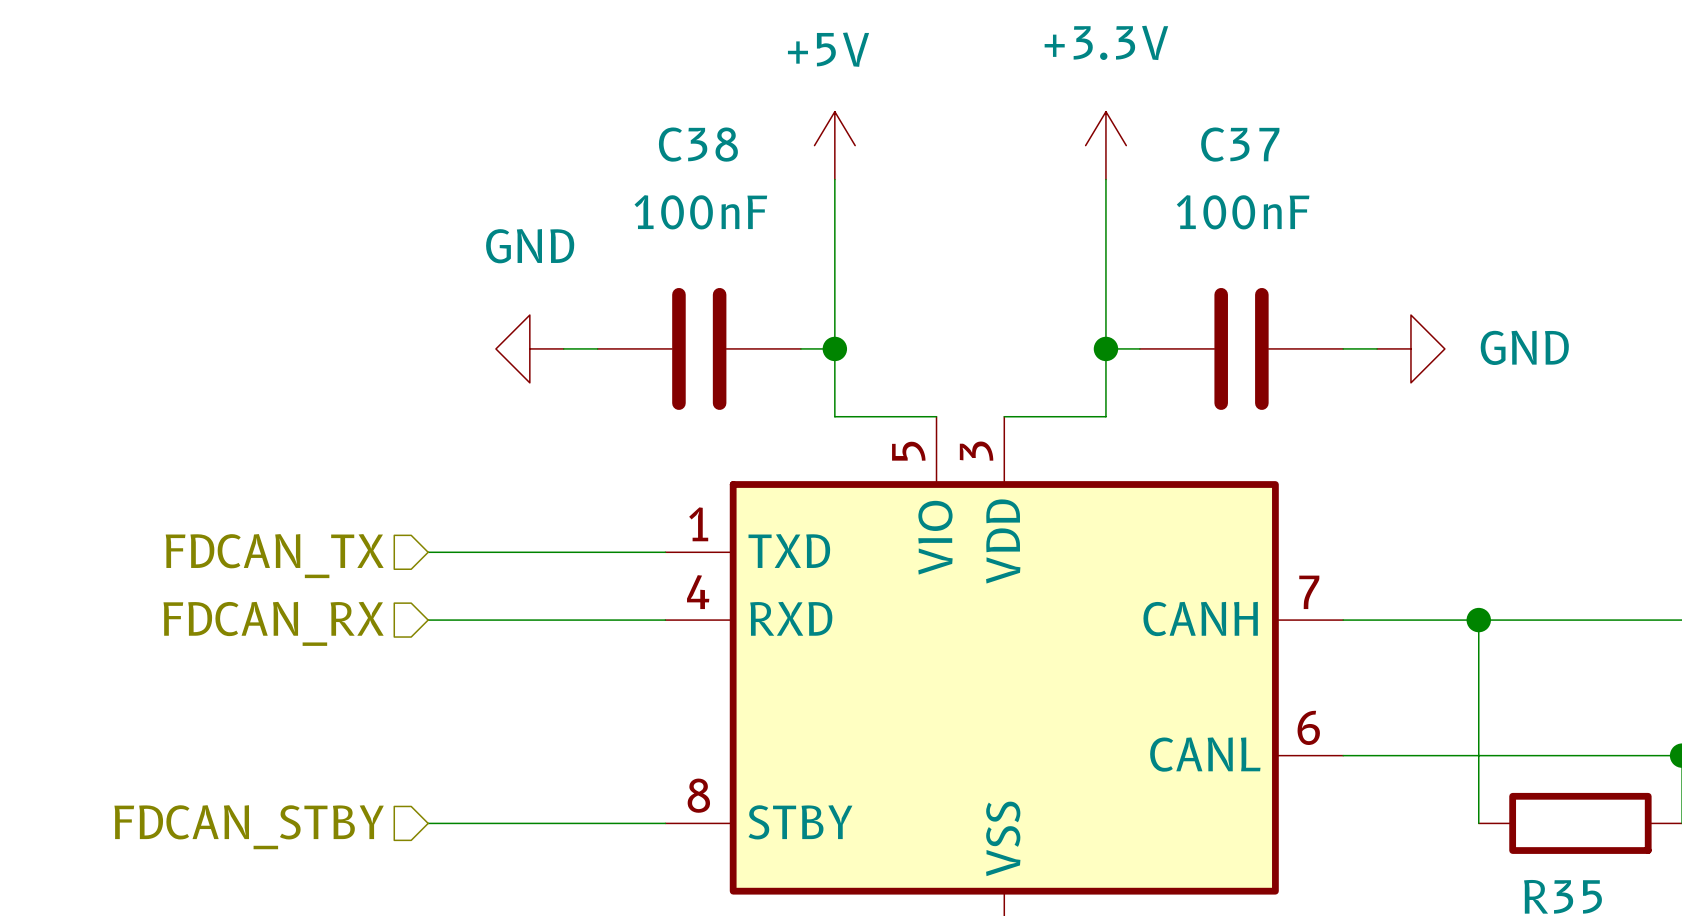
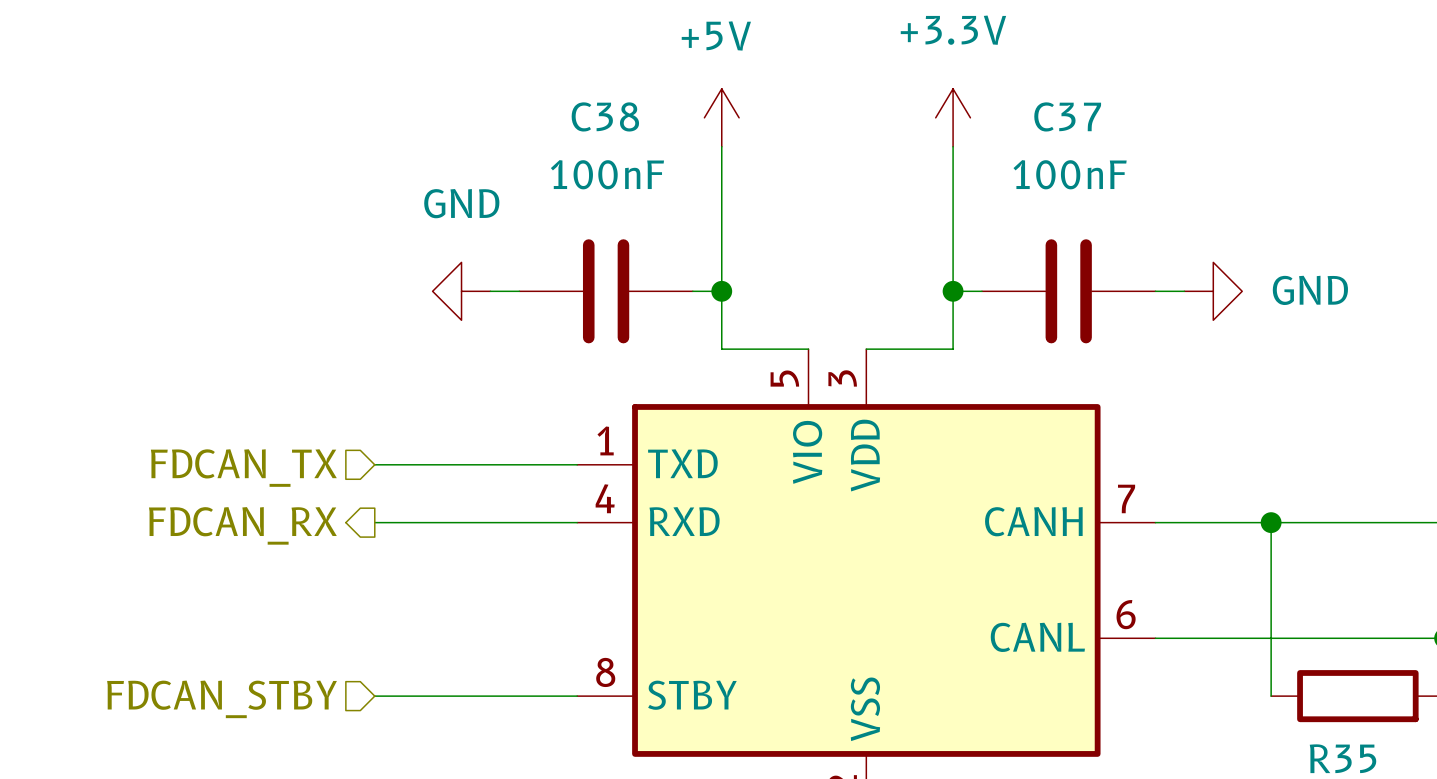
hierarchical label shape: input (273, 623) -> output (242, 525)

